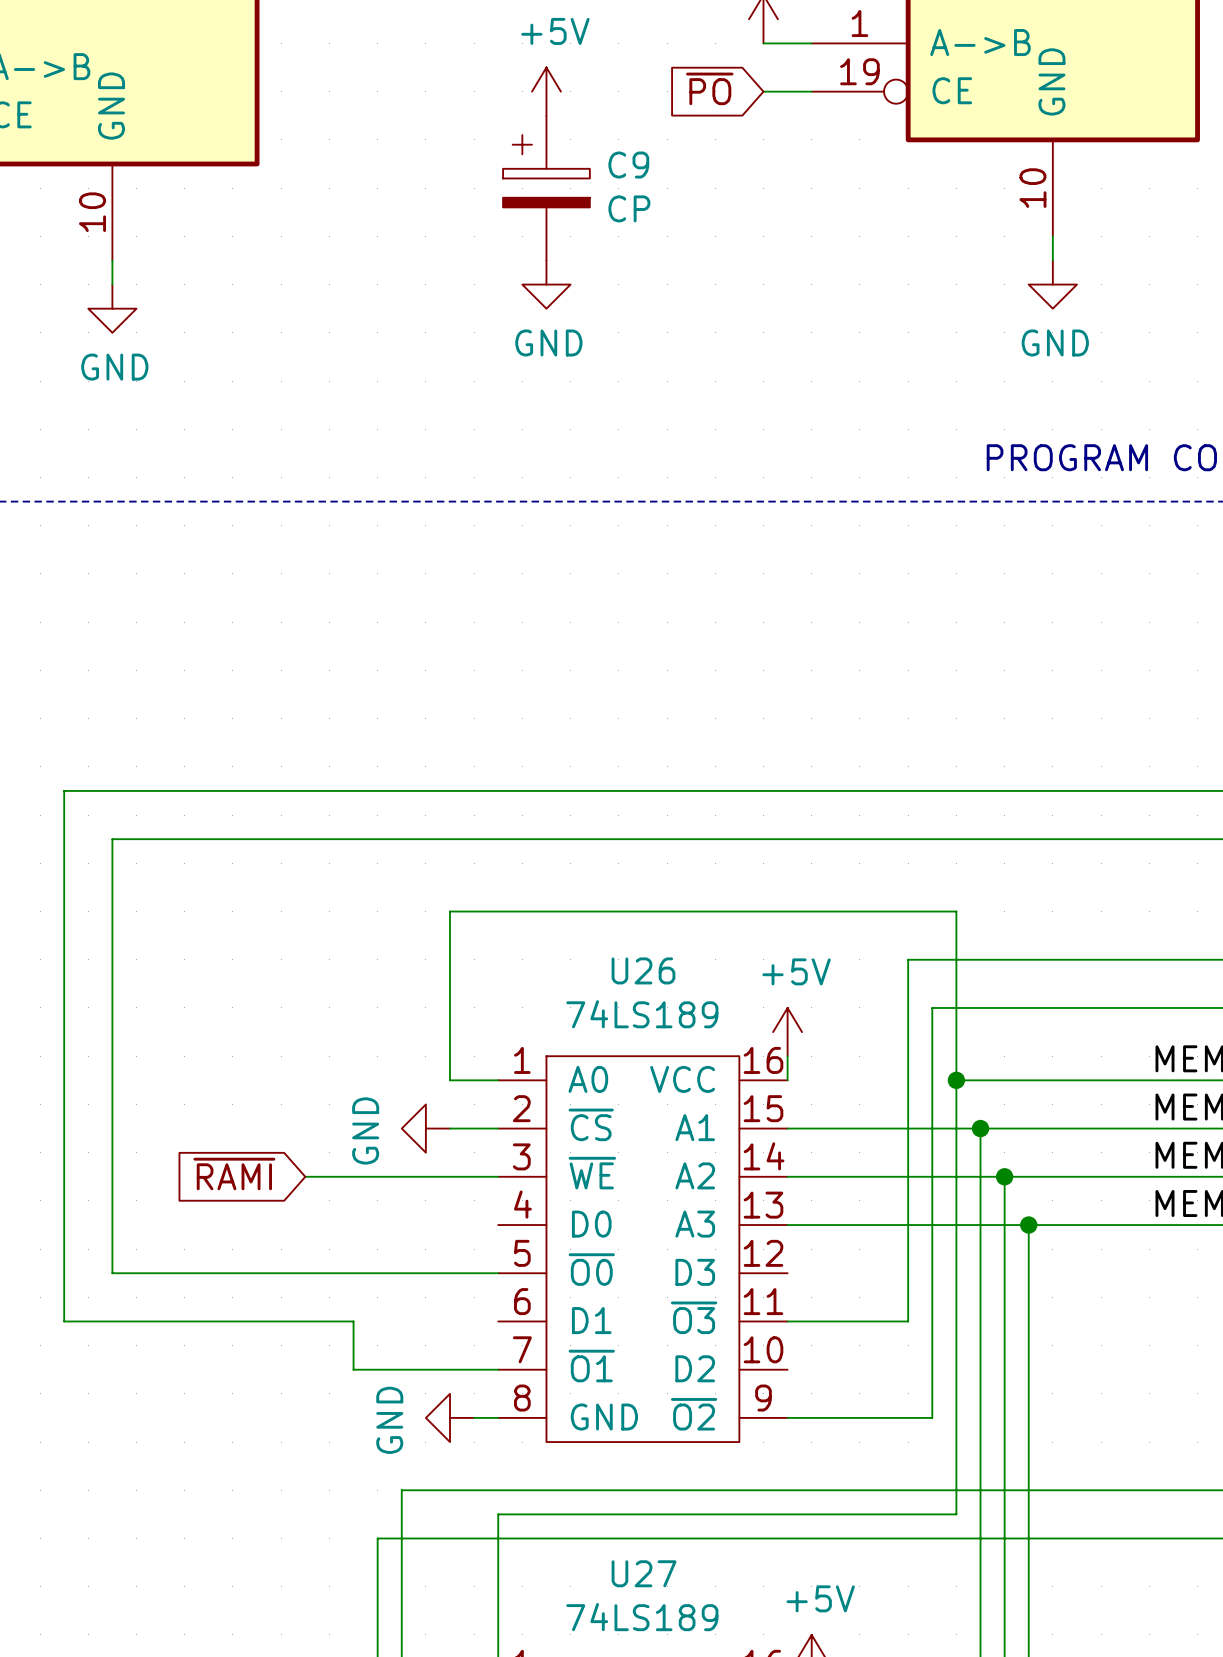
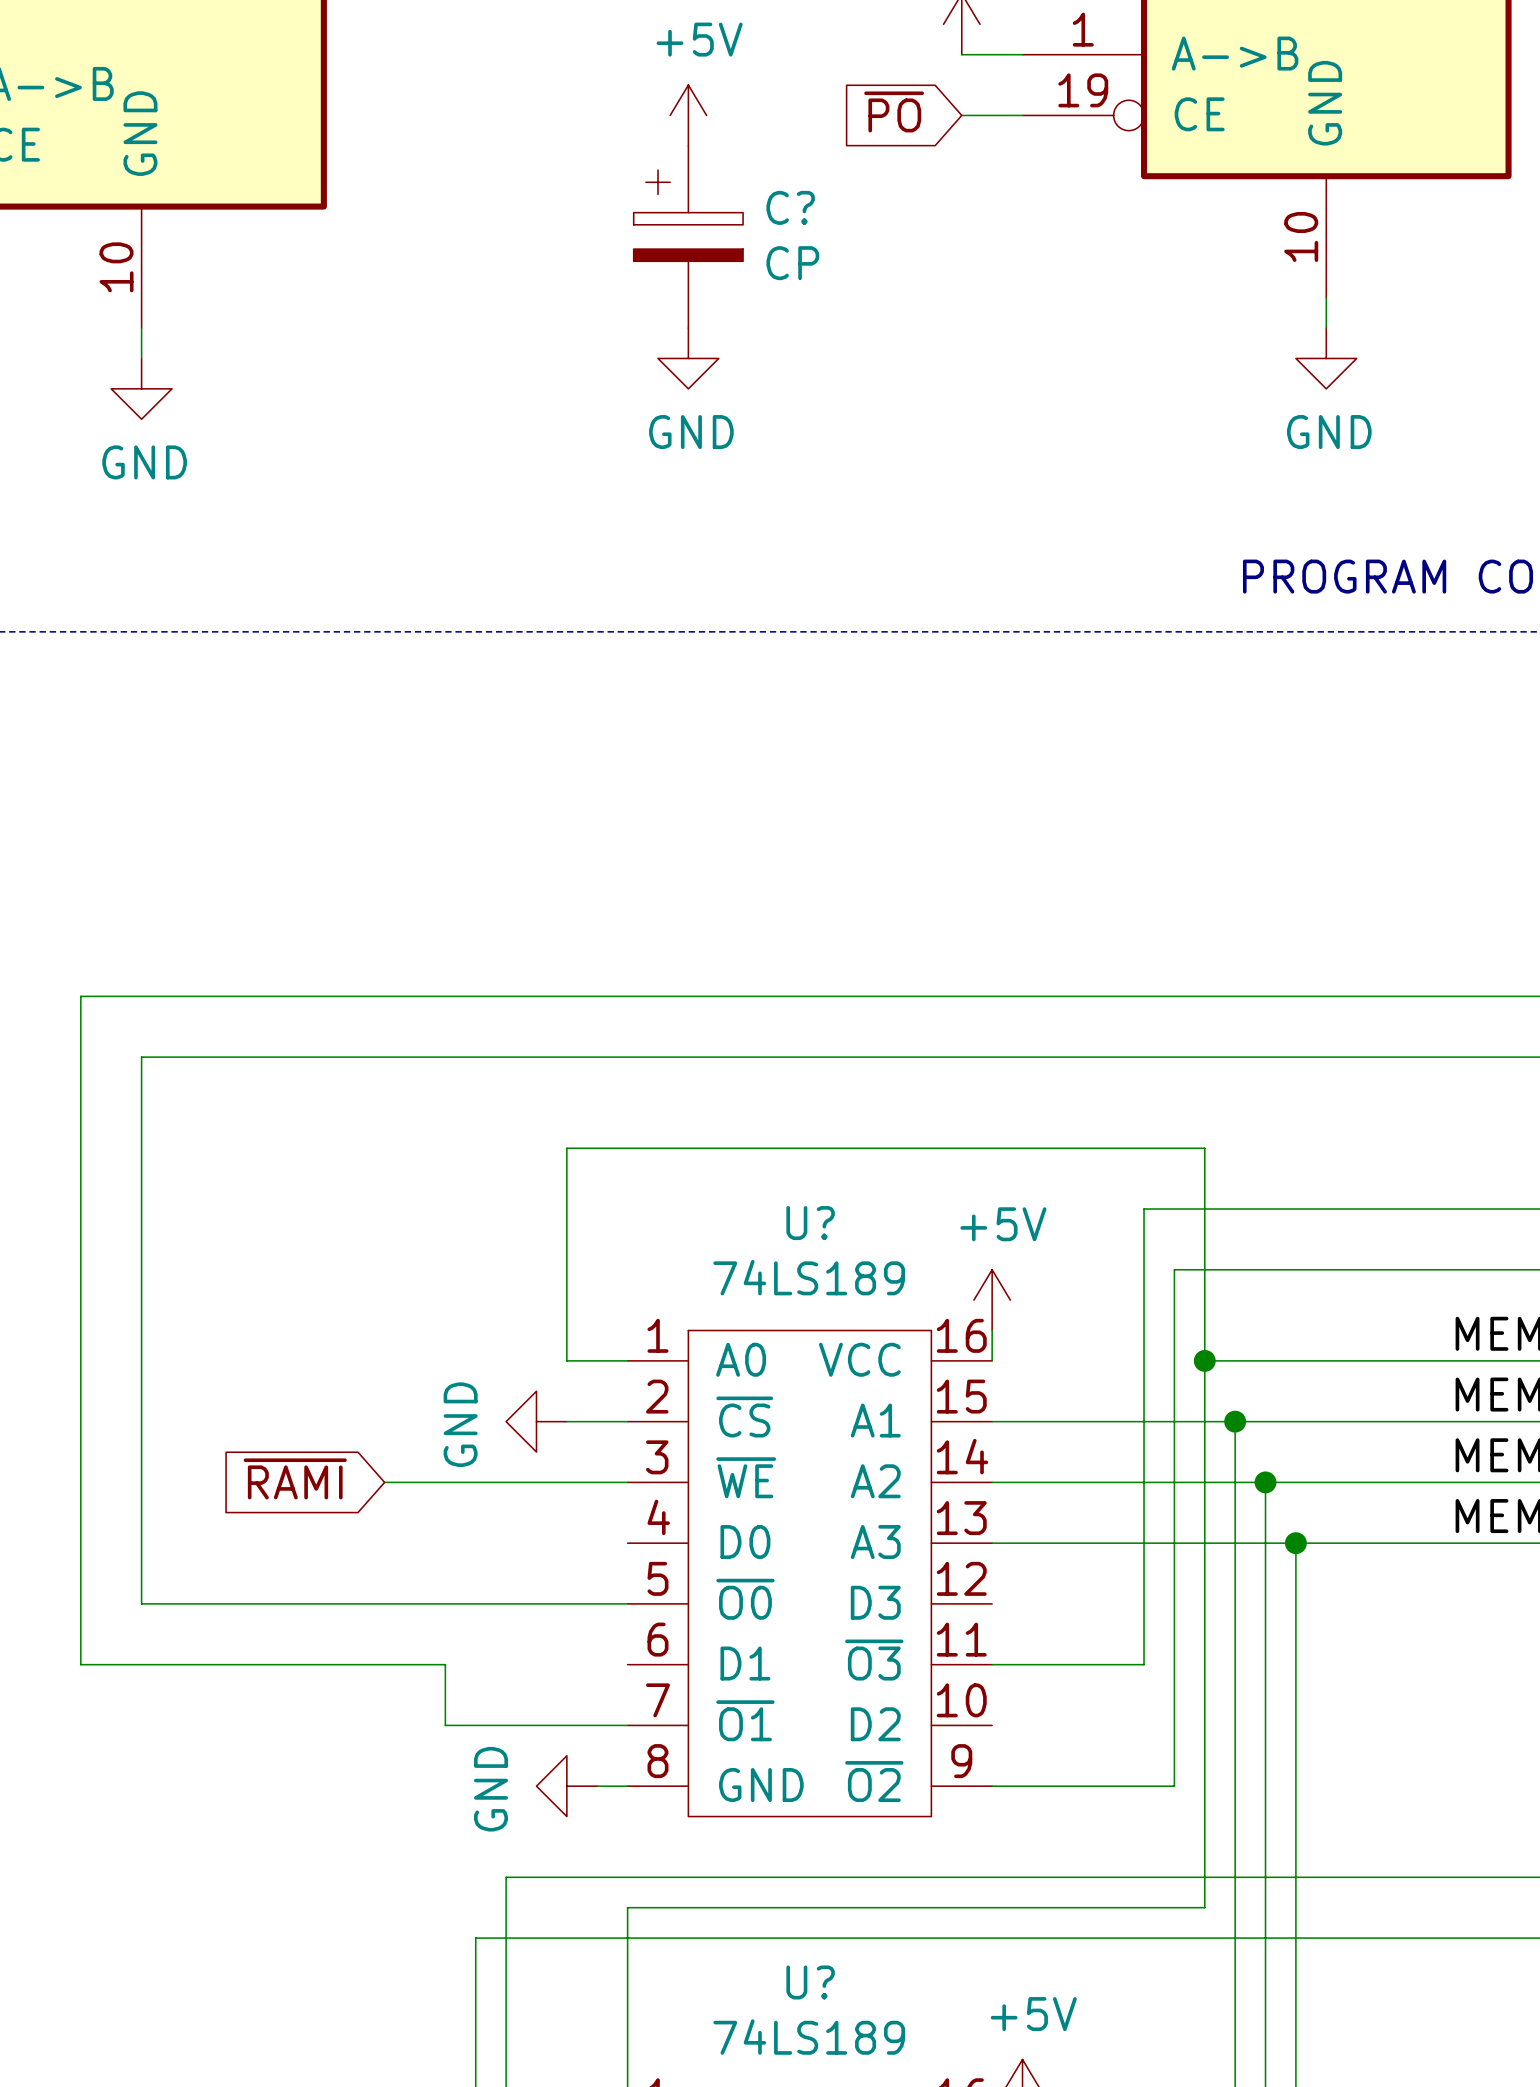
C9 name: C9 (628, 165) -> C? (790, 207)
U26 name: U26 (643, 970) -> U? (810, 1223)
U27 name: U27 (644, 1573) -> U? (810, 1982)

